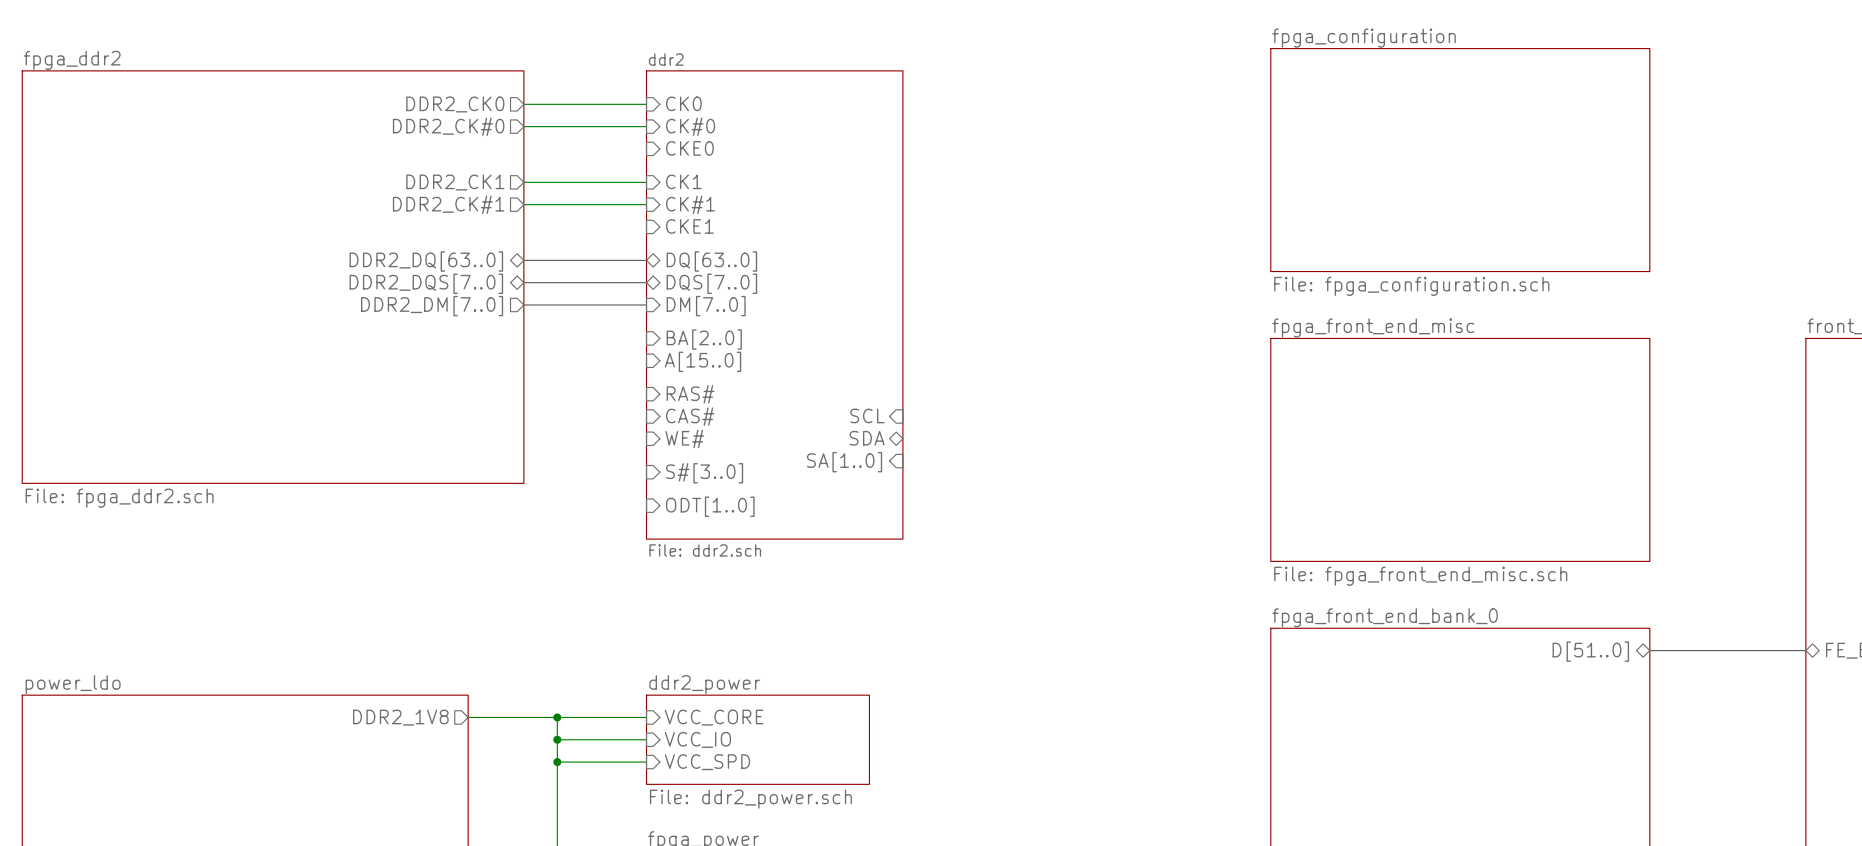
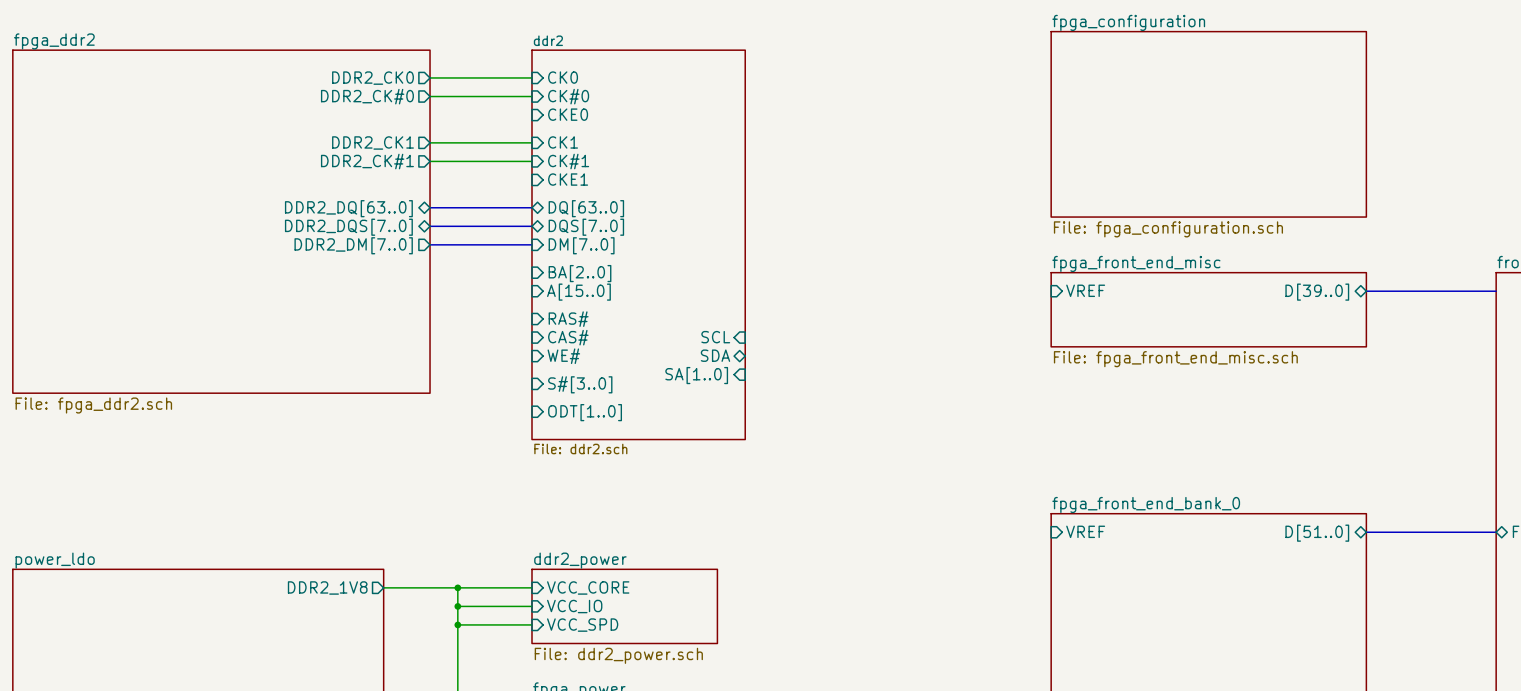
sheet pin: none -> VREF (1085, 290)
bus: none -> (1366, 291) (1496, 291)
sheet pin: none -> D[39..0] (1317, 292)
sheet fpga_front_end_misc: none -> File: fpga_front_end_misc.sch (1208, 309)
sheet fpga_front_end_misc: File: fpga_front_end_misc.sch (1460, 449) -> none
sheet pin: none -> VREF (1085, 531)

